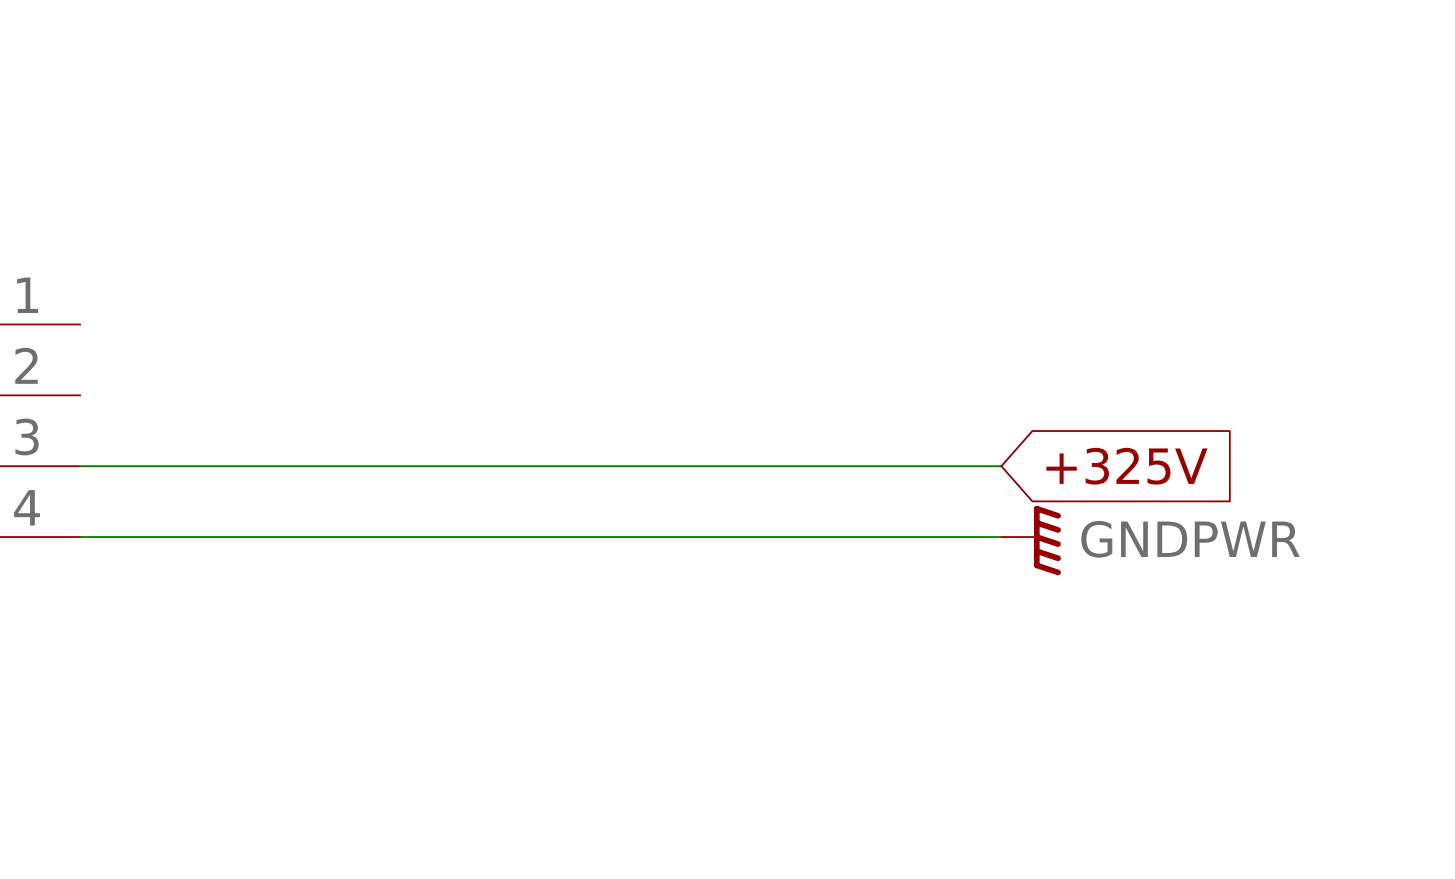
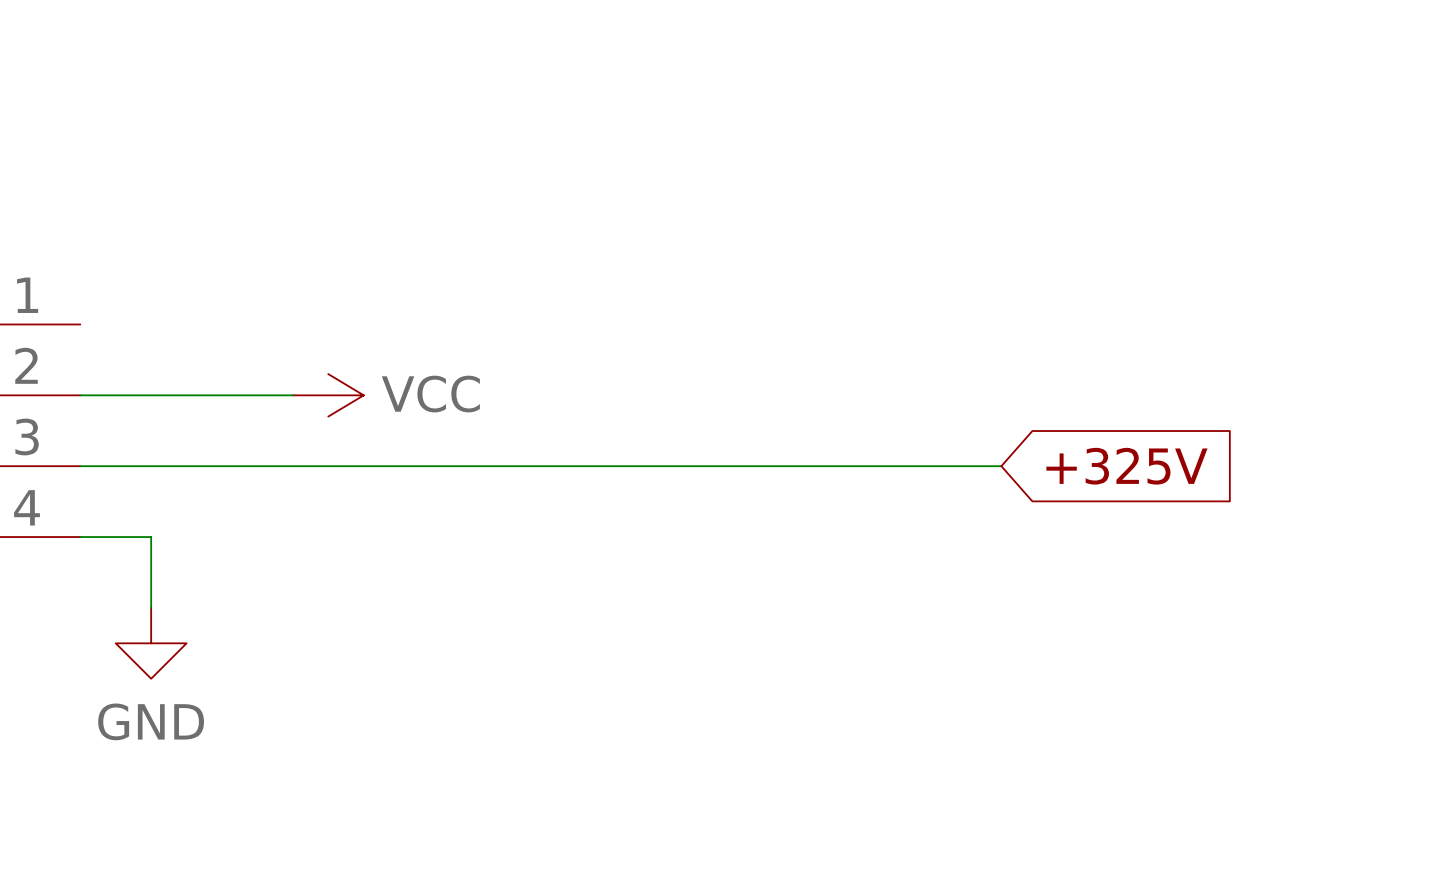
wire: none -> (80, 395) (292, 395)
power symbol: none -> VCC (328, 395)
wire: (151, 537) (1001, 537) -> (151, 537) (151, 607)
power symbol: GNDPWR (1031, 540) -> none
power symbol: none -> GND (151, 643)

